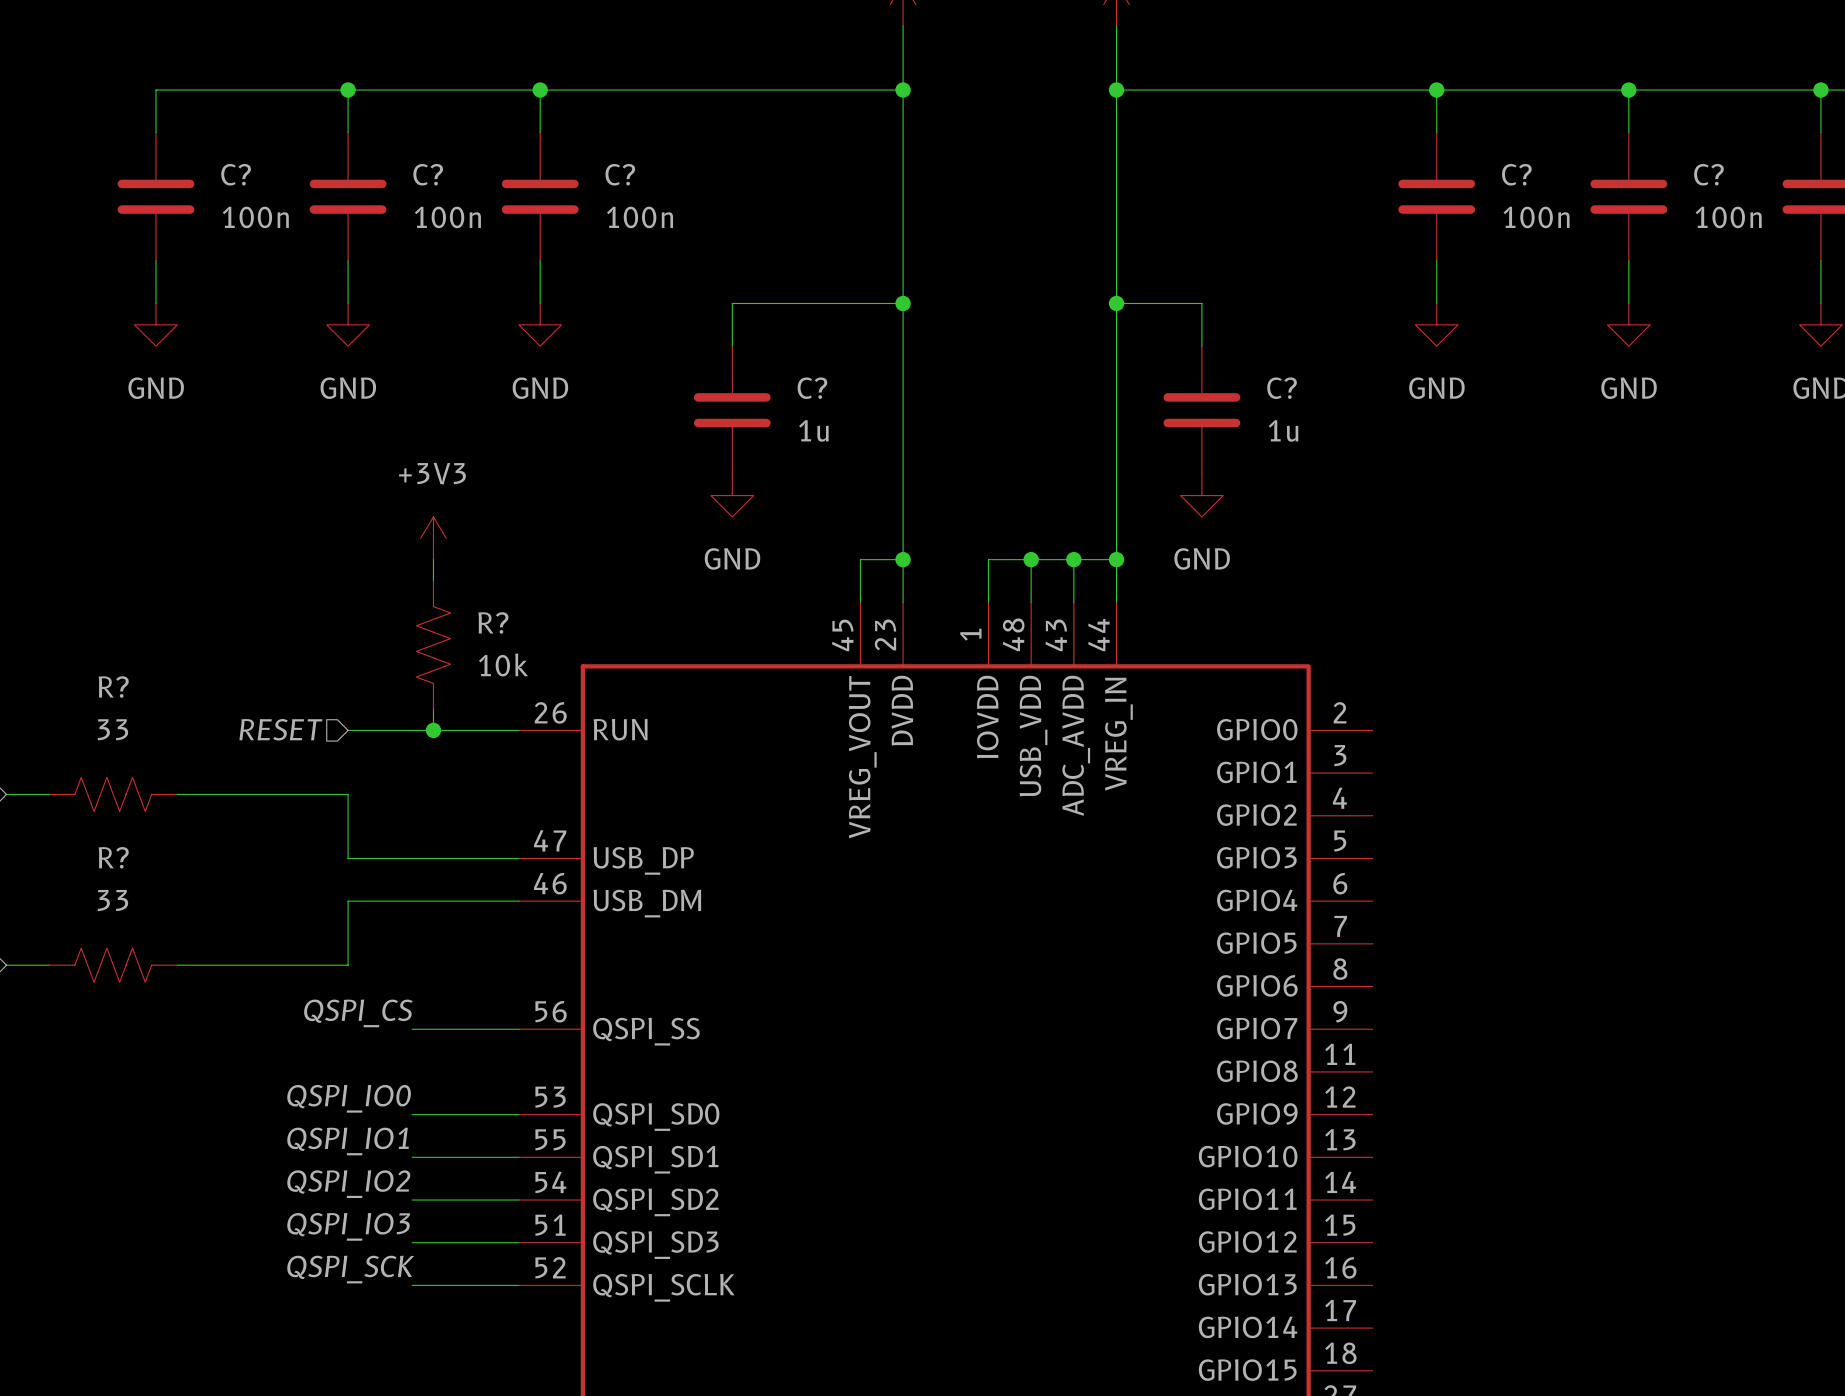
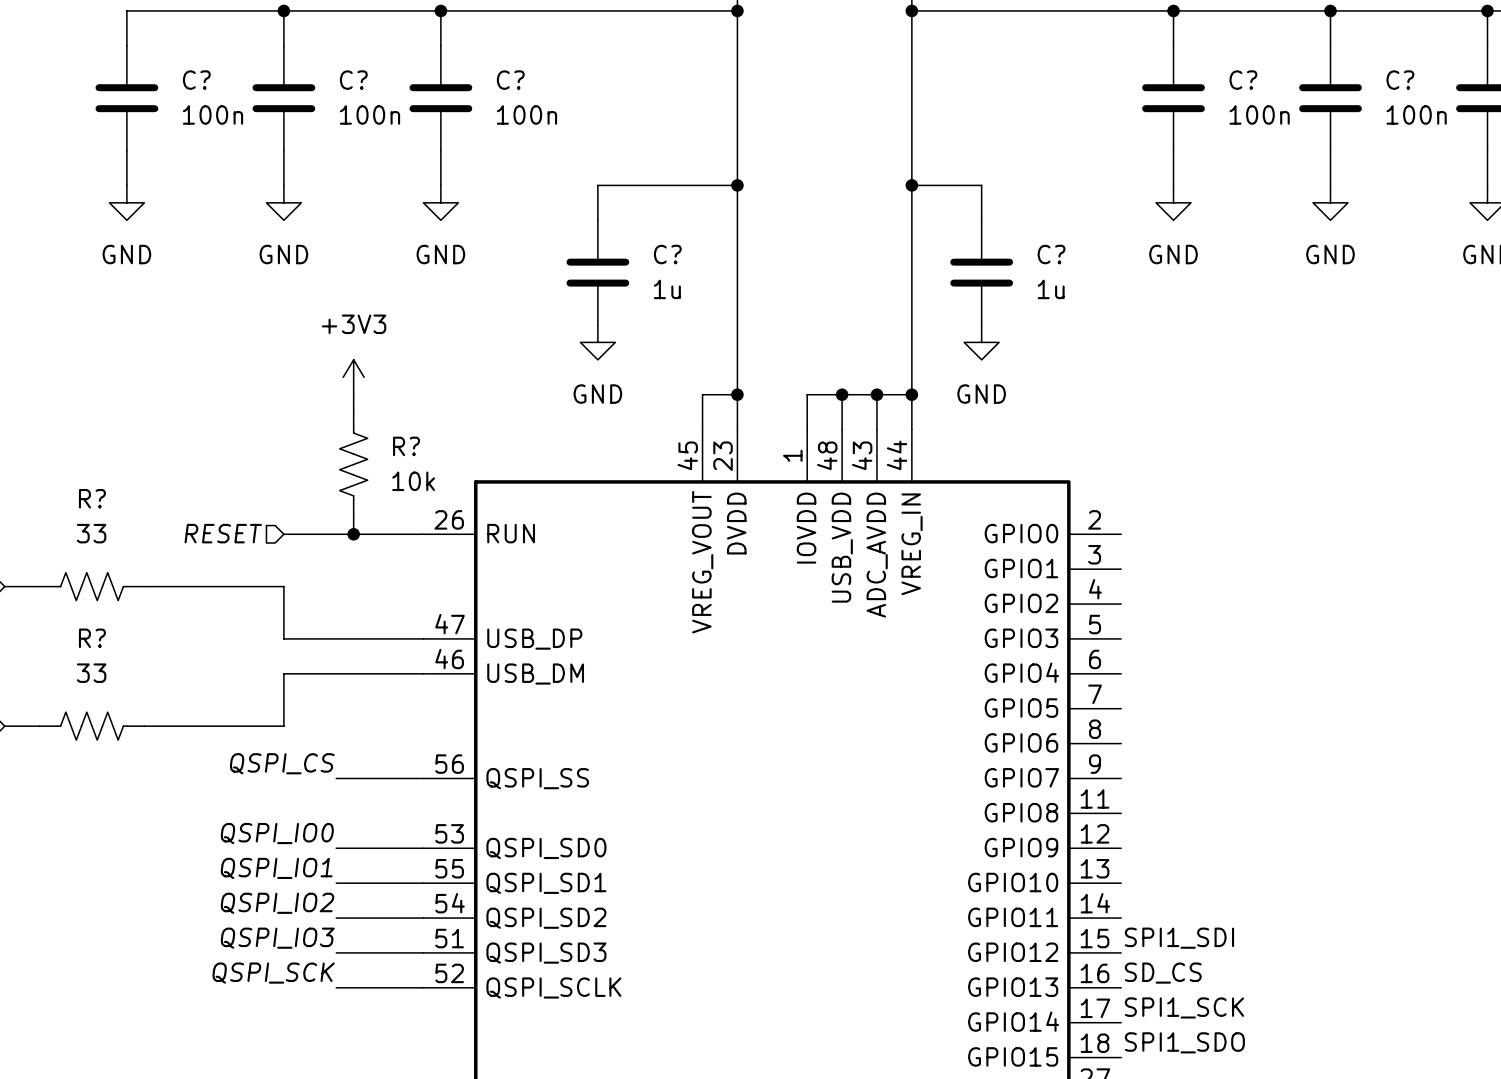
label: none -> SPI1_SDI (1179, 938)
label: none -> SD_CS (1163, 973)
label: none -> SPI1_SCK (1184, 1007)
label: none -> SPI1_SDO (1184, 1042)

